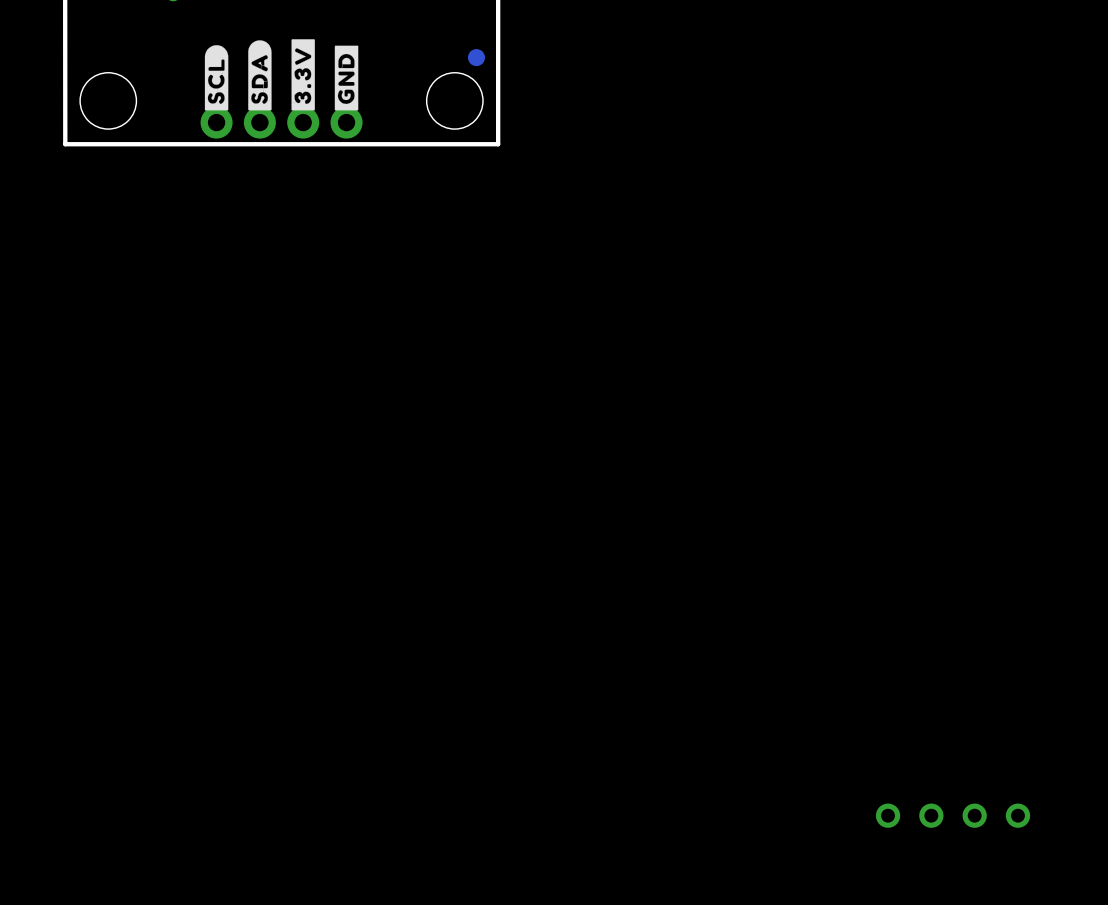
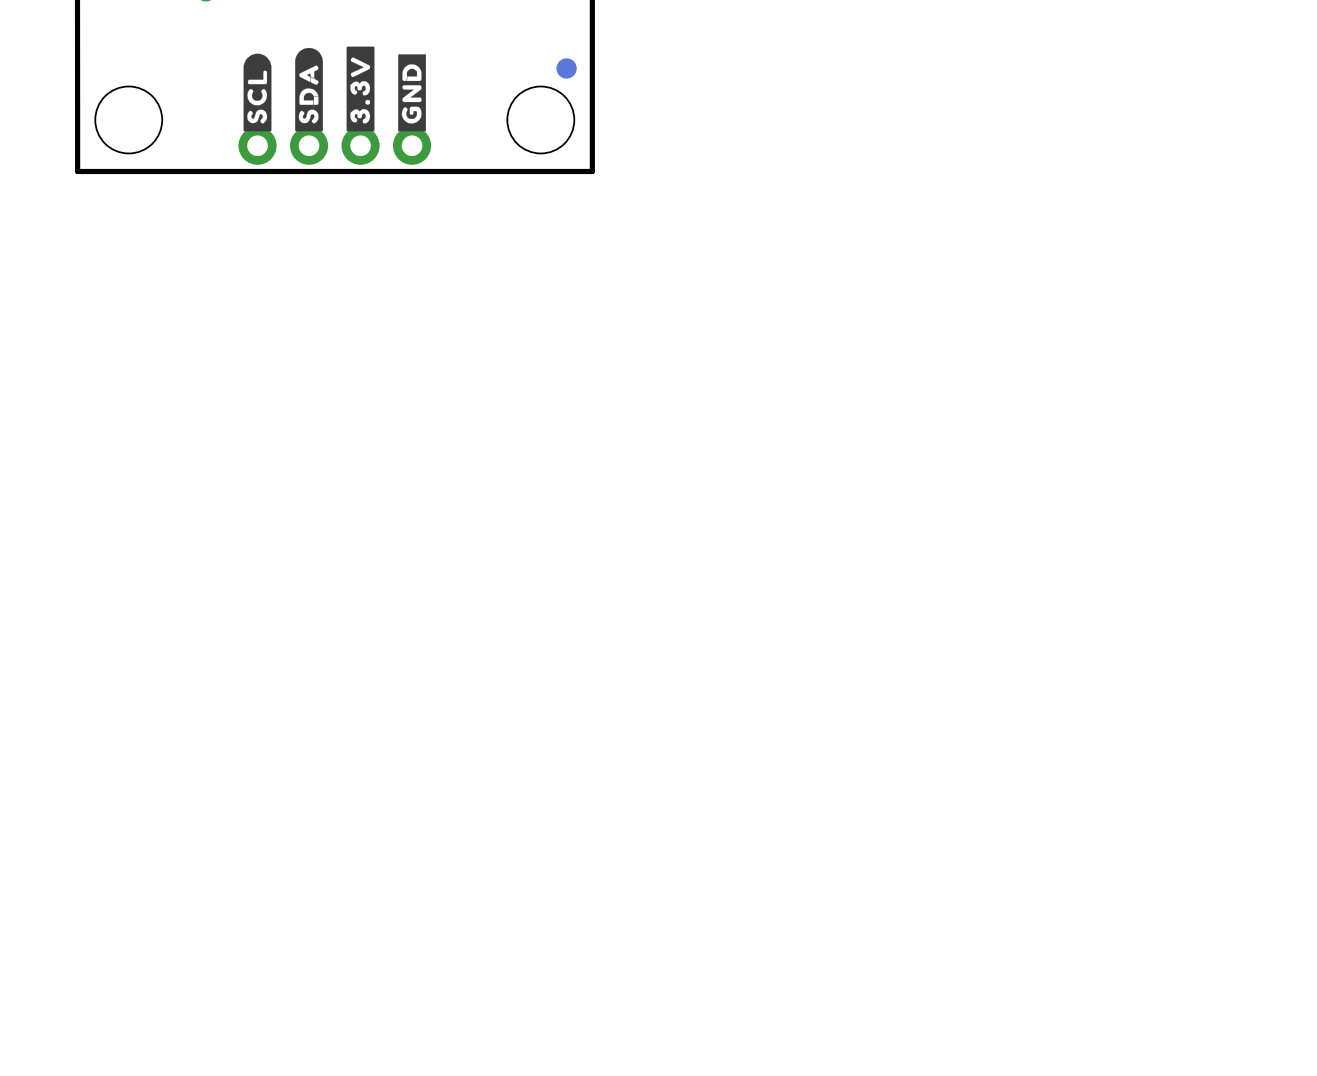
part: (909, 815) -> none
part: (996, 815) -> none

